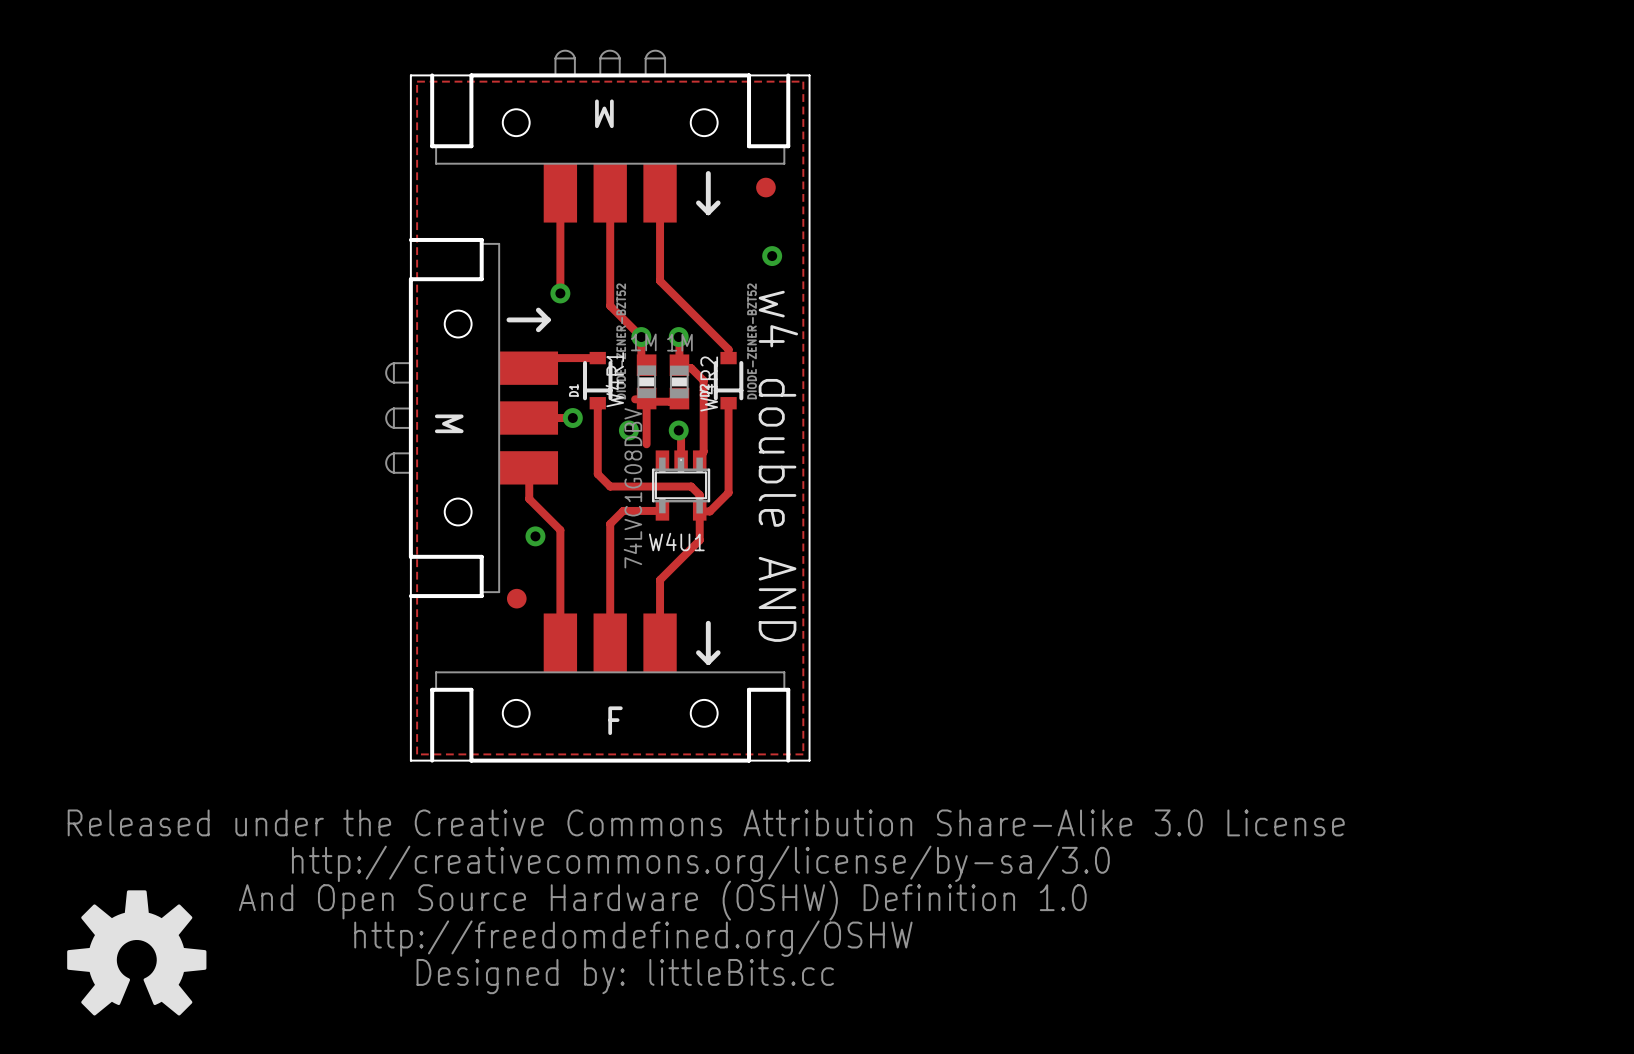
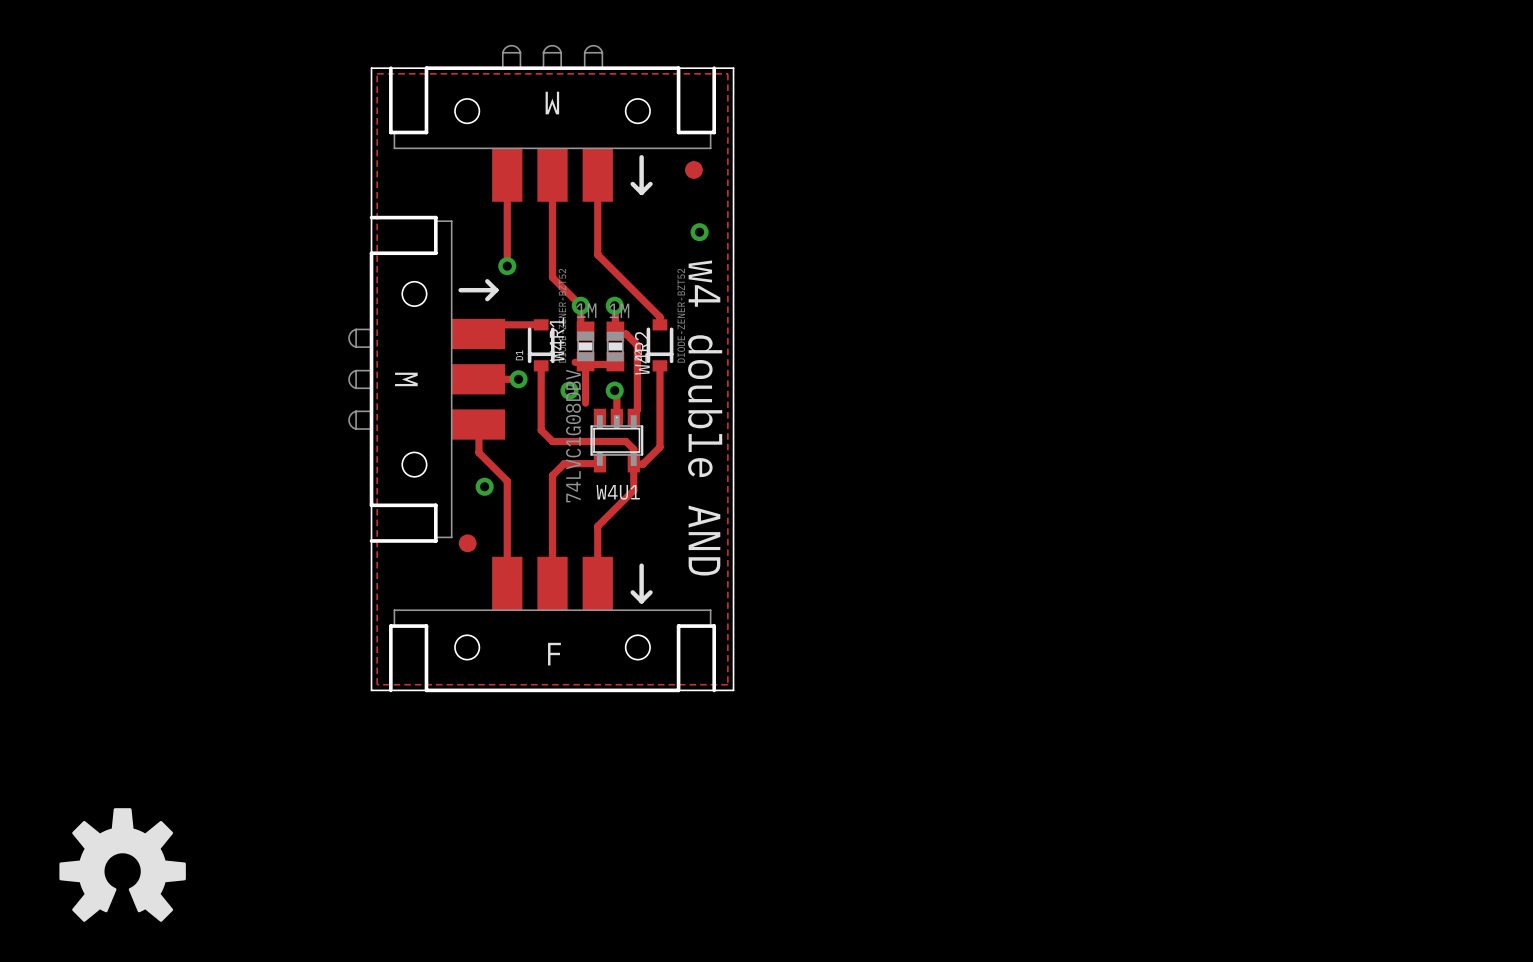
drawing: [67, 809, 1345, 995] -> none

